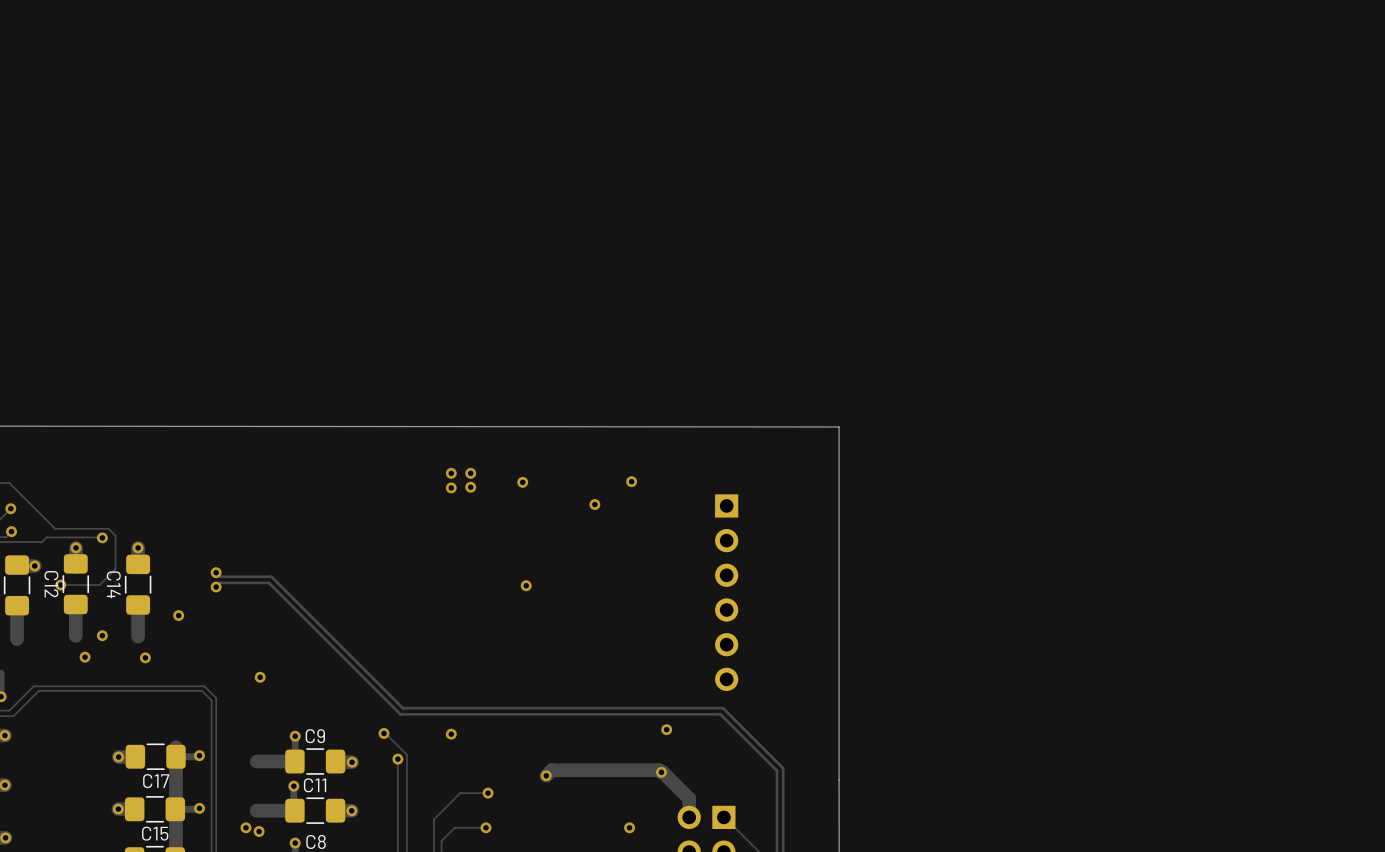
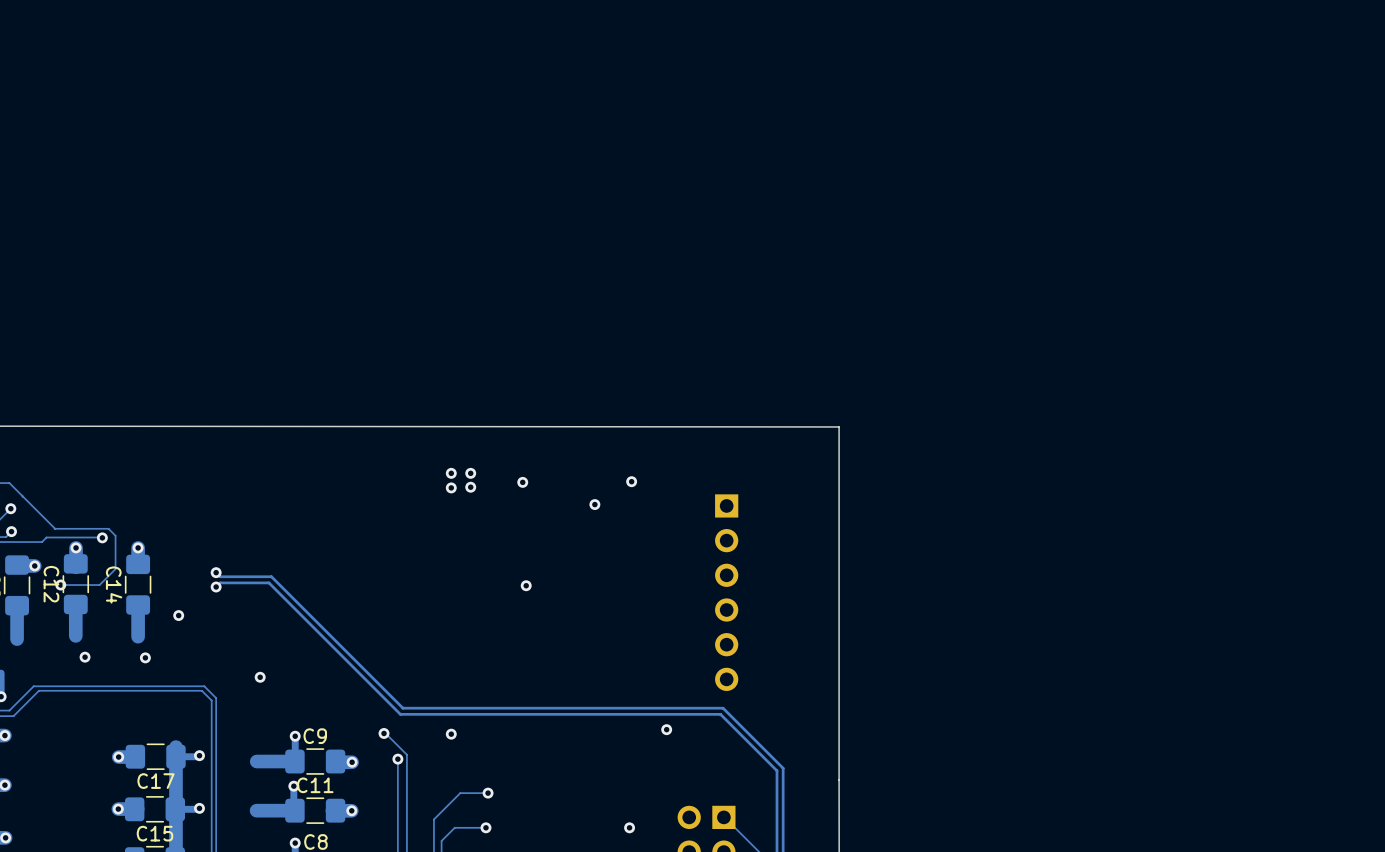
via: (102, 635) -> none
via: (661, 772) -> none
track: (546, 775) (551, 770) (659, 770) (689, 798) (689, 817) -> none
via: (546, 775) -> none
via: (245, 827) -> none
via: (259, 831) -> none

